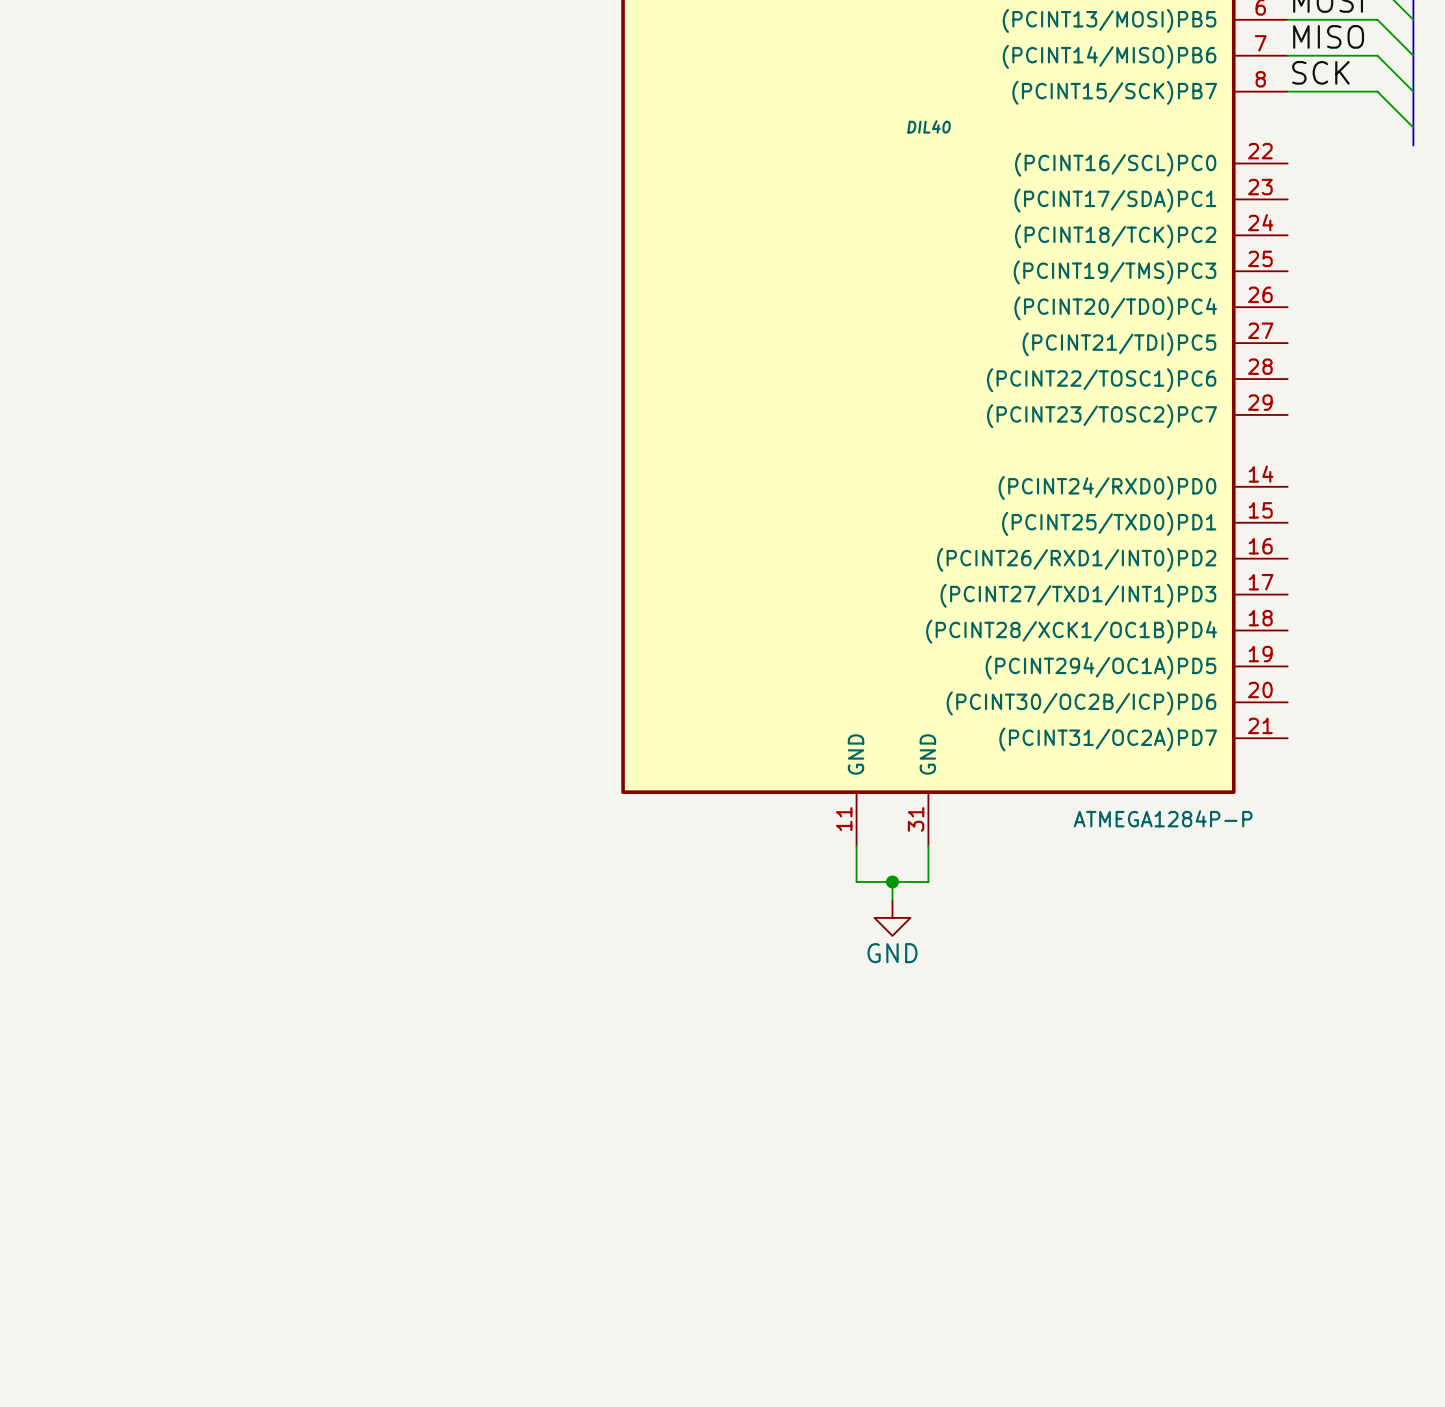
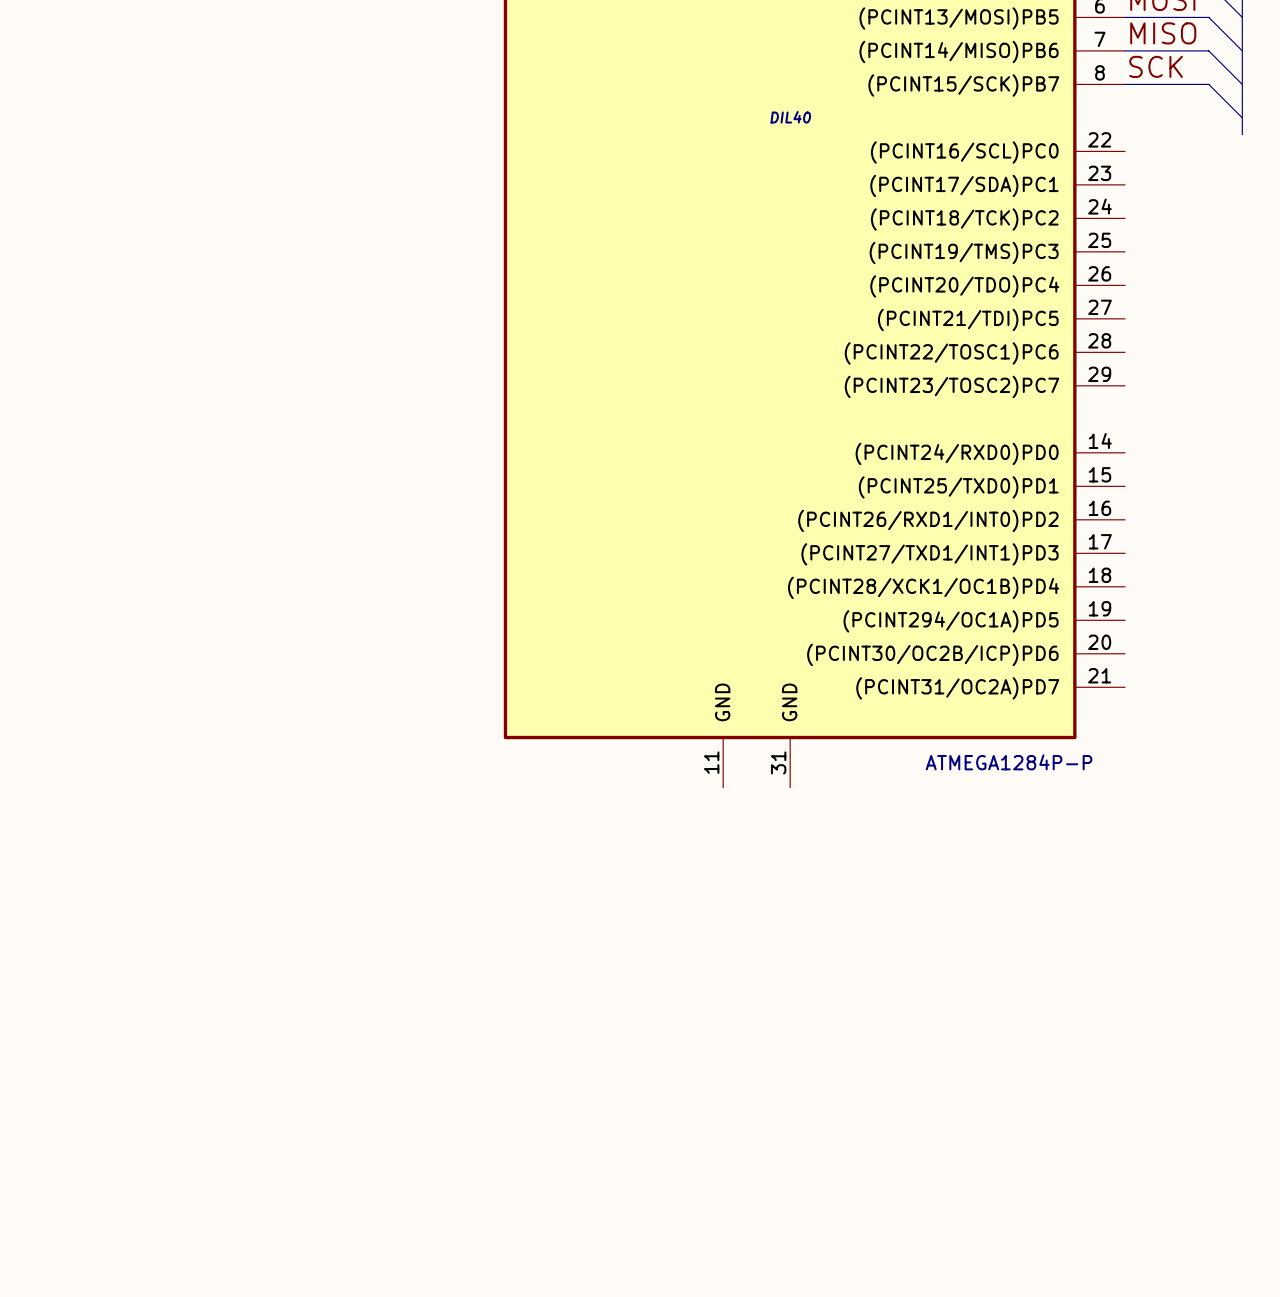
wire: (856, 846) (856, 881) (928, 881) (928, 846) -> none
wire: (892, 881) (892, 899) -> none
junction: (892, 881) -> none
power symbol: GND (892, 917) -> none

